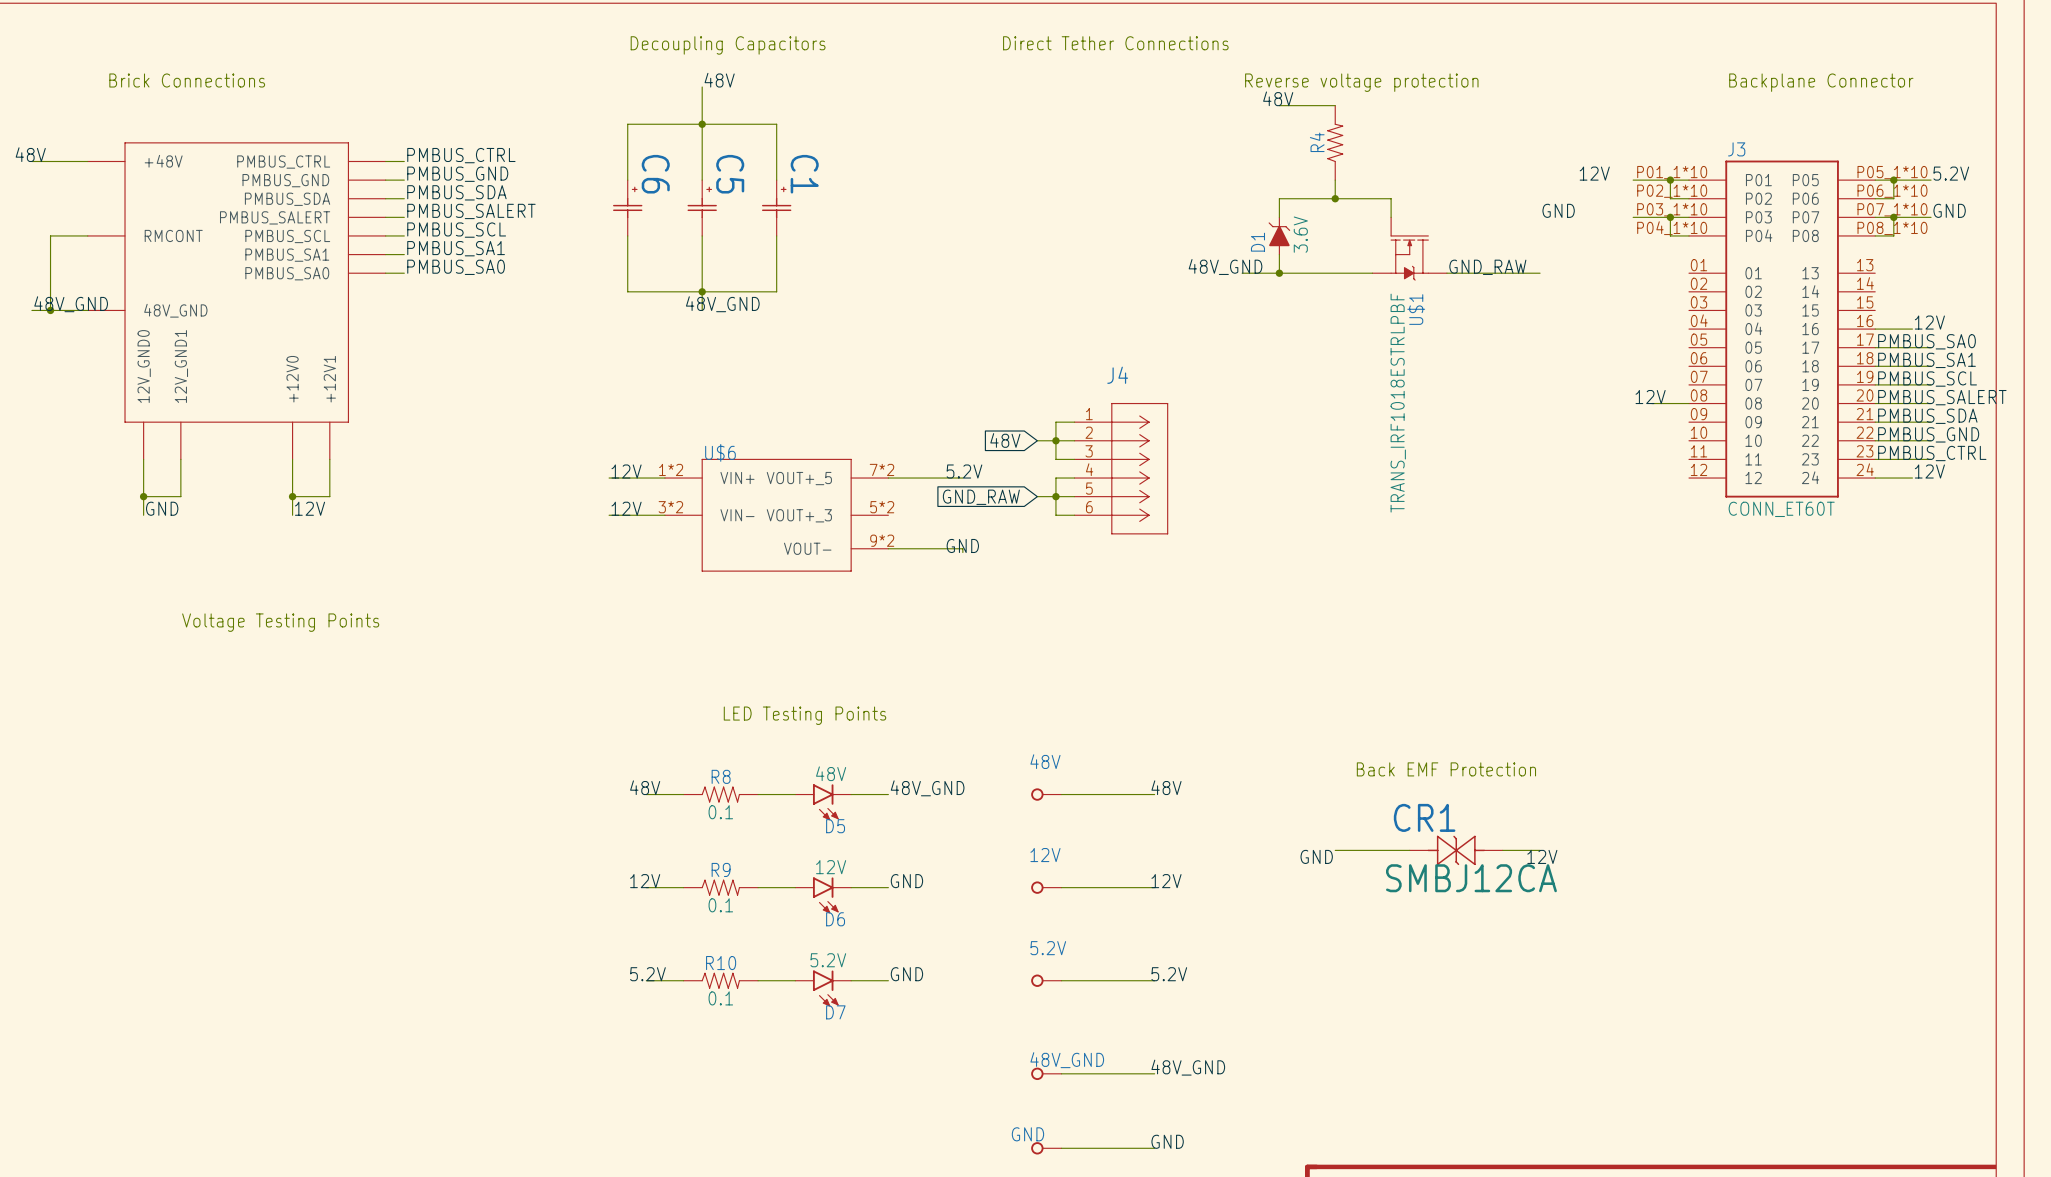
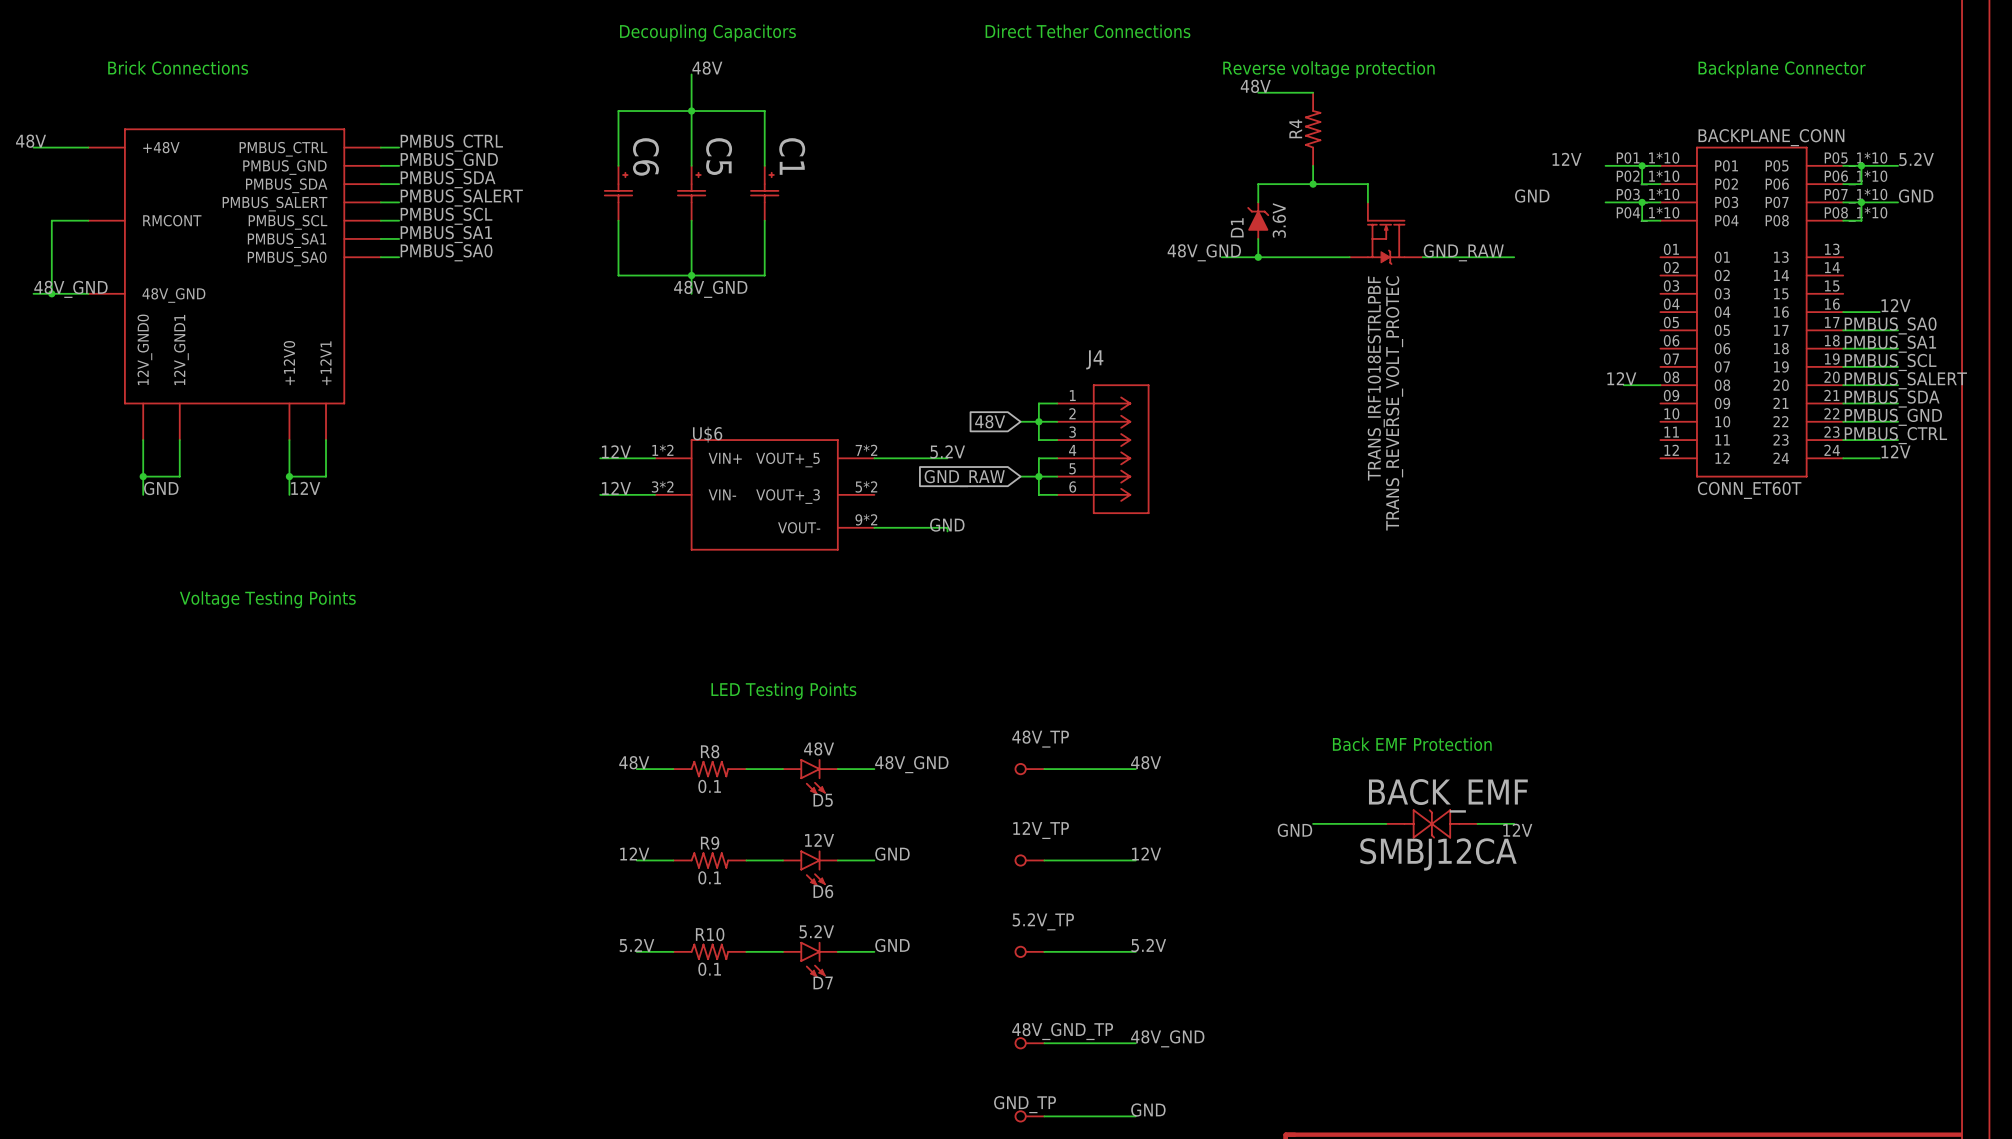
J3 name: J3 (1736, 149) -> BACKPLANE_CONN (1771, 137)
U$1 name: U$1 (1416, 309) -> TRANS_REVERSE_VOLT_PROTEC (1394, 403)
48V name: 48V (1045, 761) -> 48V_TP (1040, 739)
CR1 name: CR1 (1424, 817) -> BACK_EMF (1448, 795)
12V name: 12V (1045, 855) -> 12V_TP (1041, 830)
5.2V name: 5.2V (1048, 948) -> 5.2V_TP (1043, 921)
48V_GND name: 48V_GND (1067, 1060) -> 48V_GND_TP (1062, 1031)
GND name: GND (1027, 1134) -> GND_TP (1025, 1104)

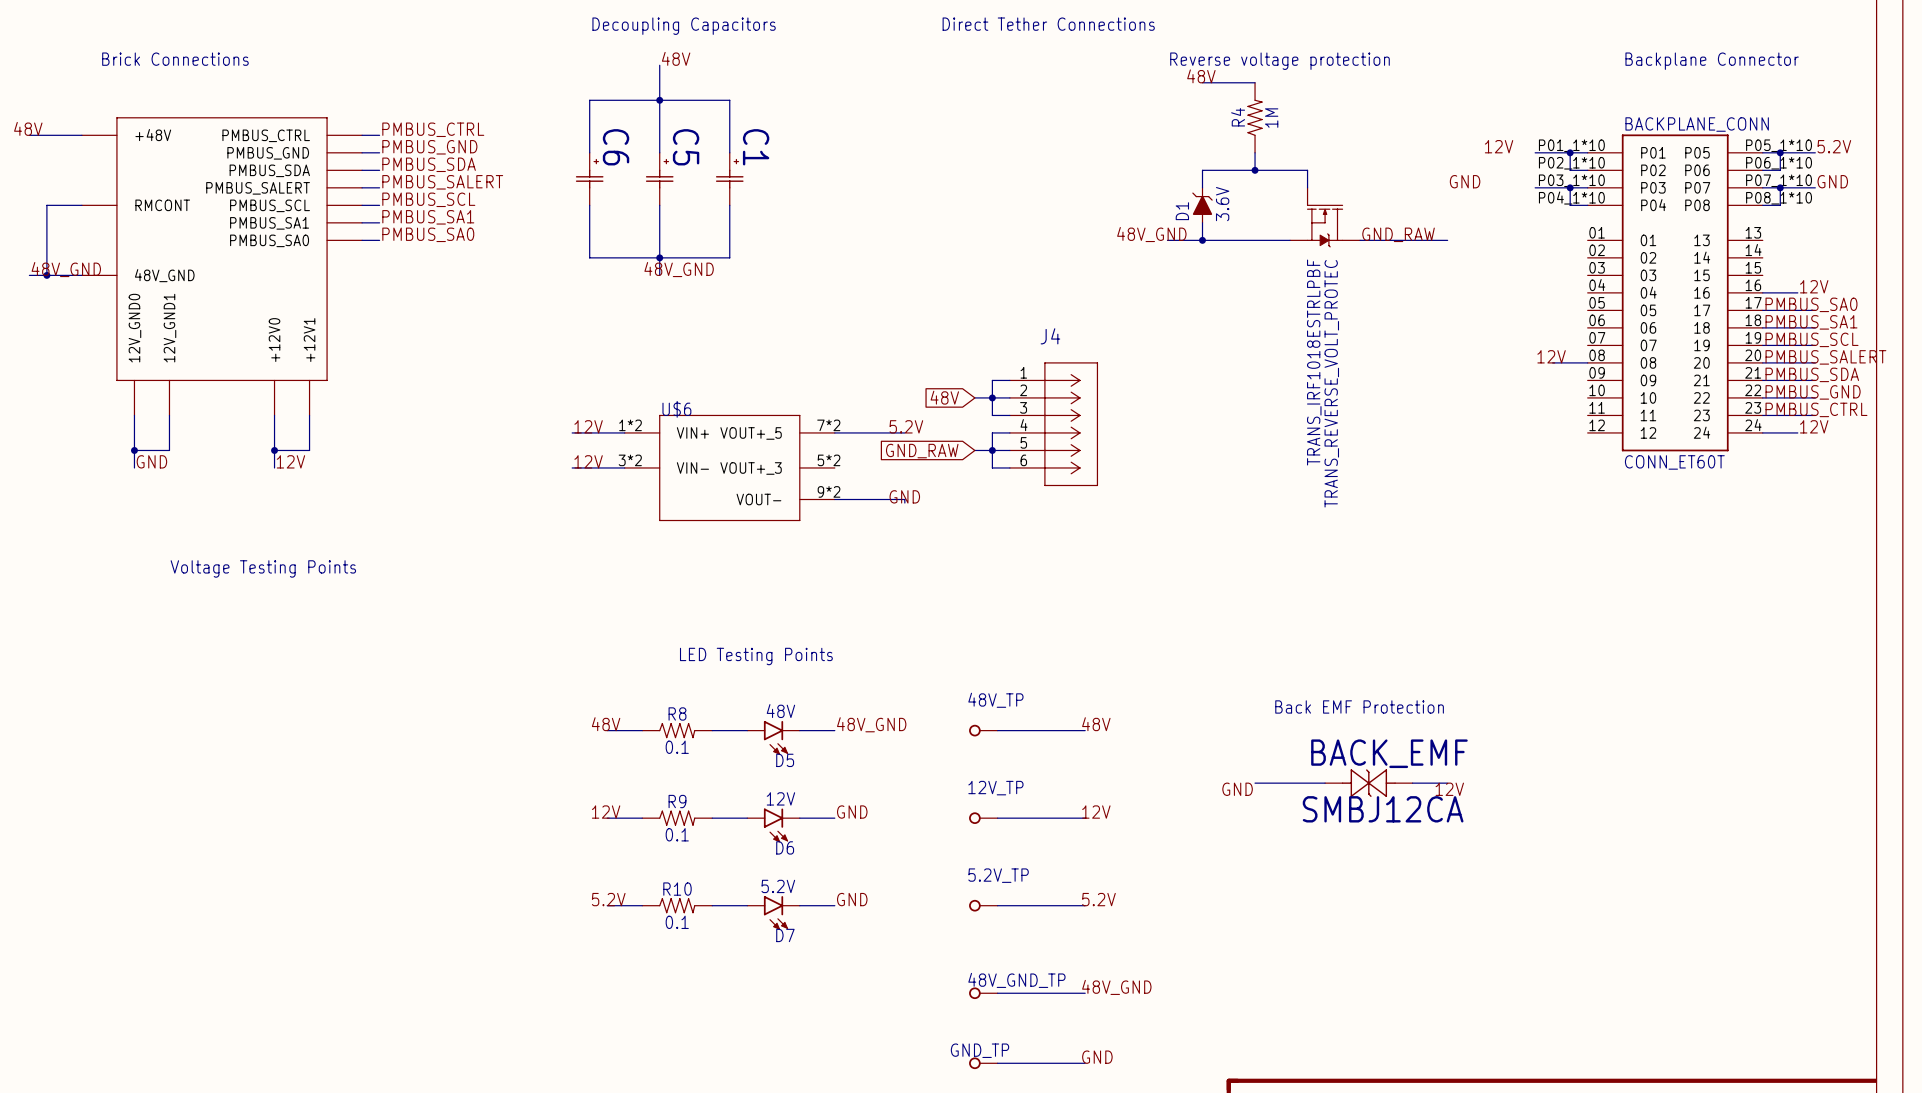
R4 value: none -> 1M (1271, 118)

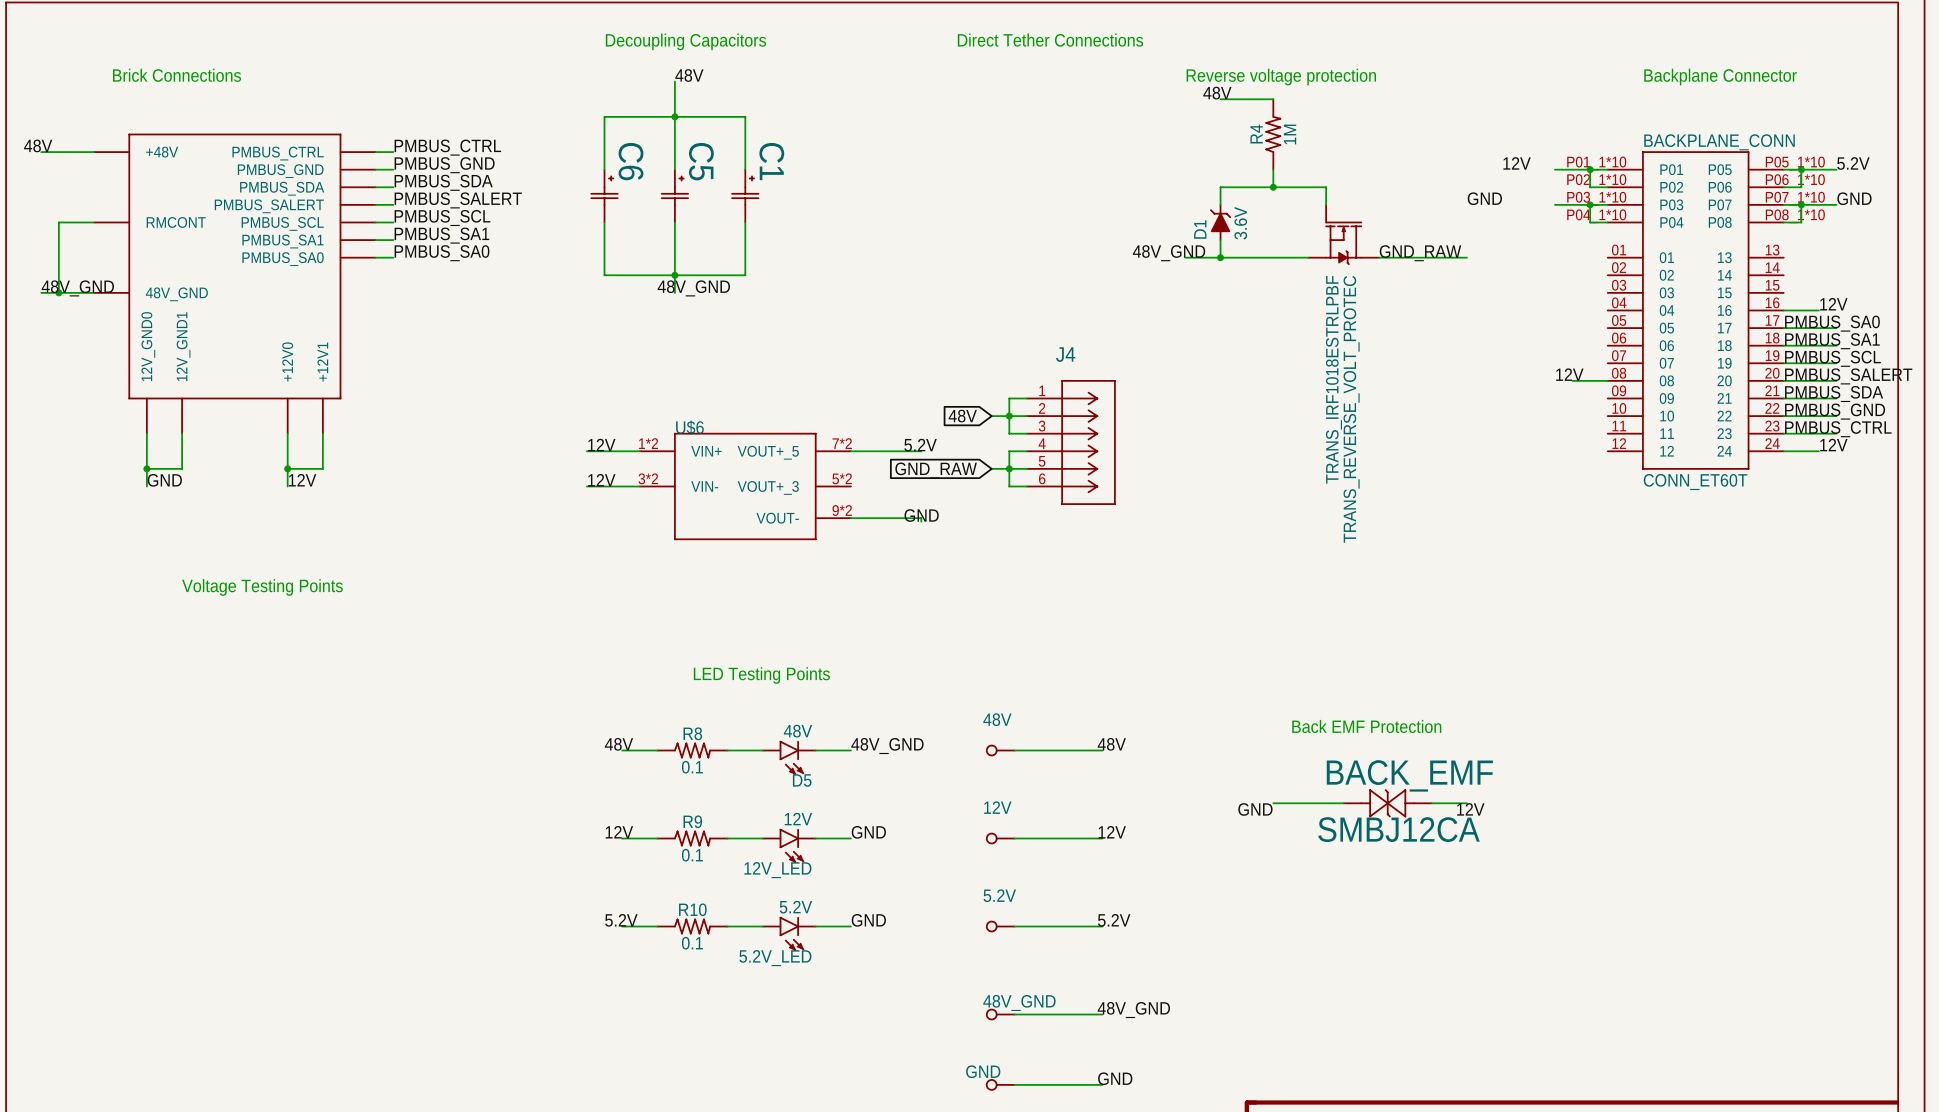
48V_TP name: 48V_TP (995, 700) -> 48V (997, 719)
12V_TP name: 12V_TP (995, 788) -> 12V (997, 807)
D6 name: D6 (785, 847) -> 12V_LED (777, 870)
5.2V_TP name: 5.2V_TP (998, 875) -> 5.2V (999, 895)
D7 name: D7 (785, 935) -> 5.2V_LED (775, 958)
48V_GND_TP name: 48V_GND_TP (1016, 980) -> 48V_GND (1019, 1002)
GND_TP name: GND_TP (979, 1050) -> GND (983, 1071)

